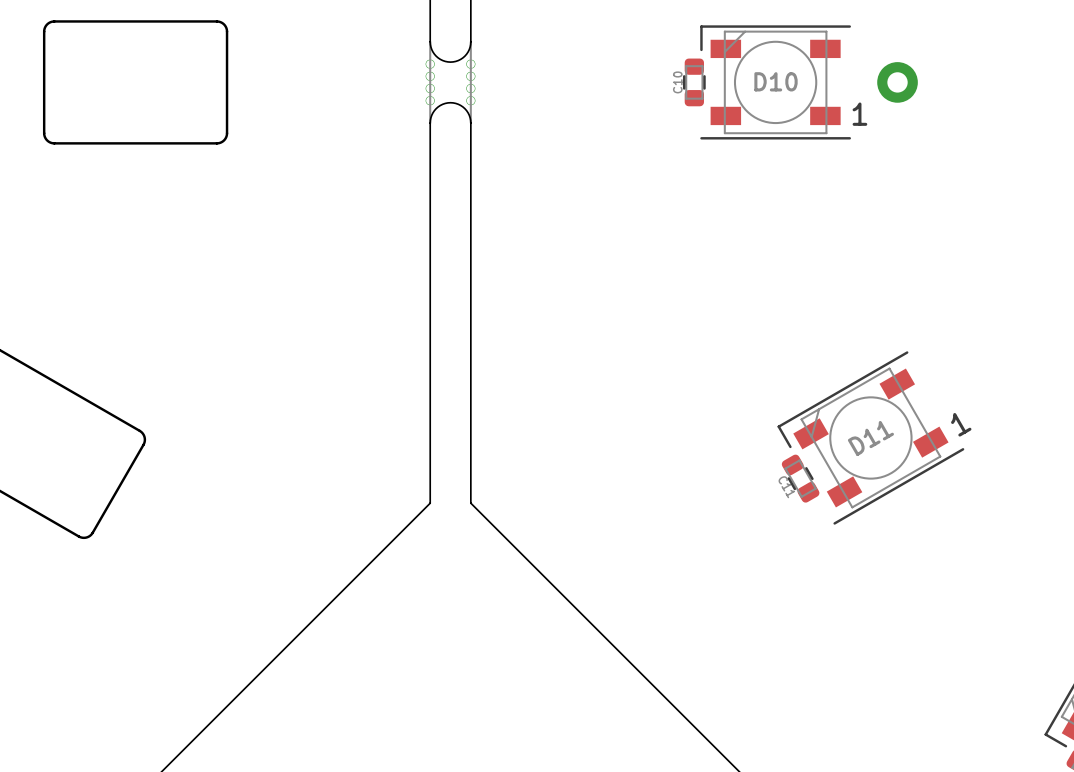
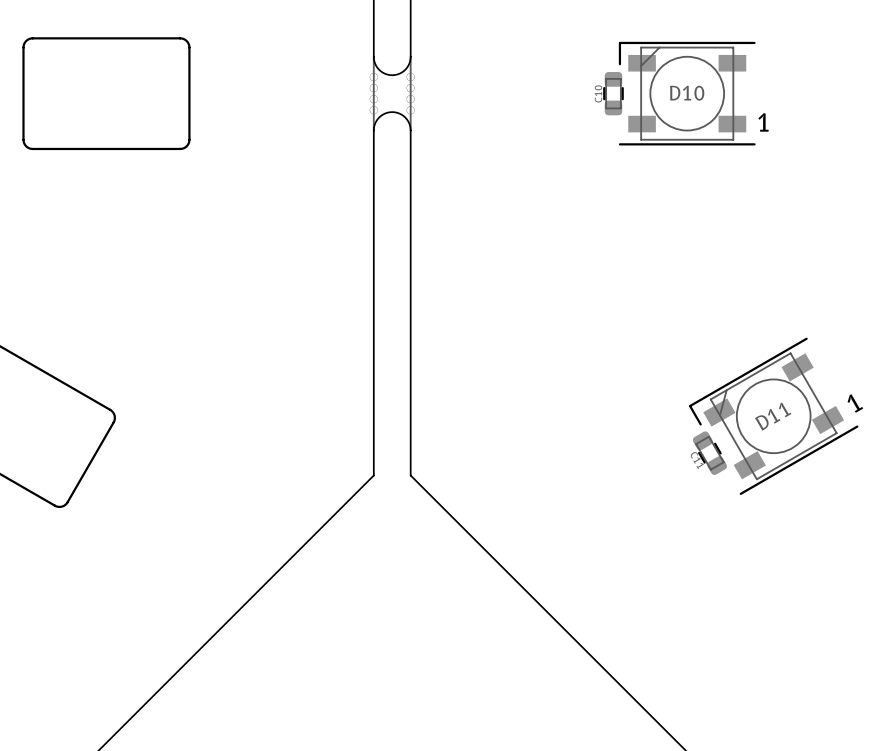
part: (897, 82) -> none

